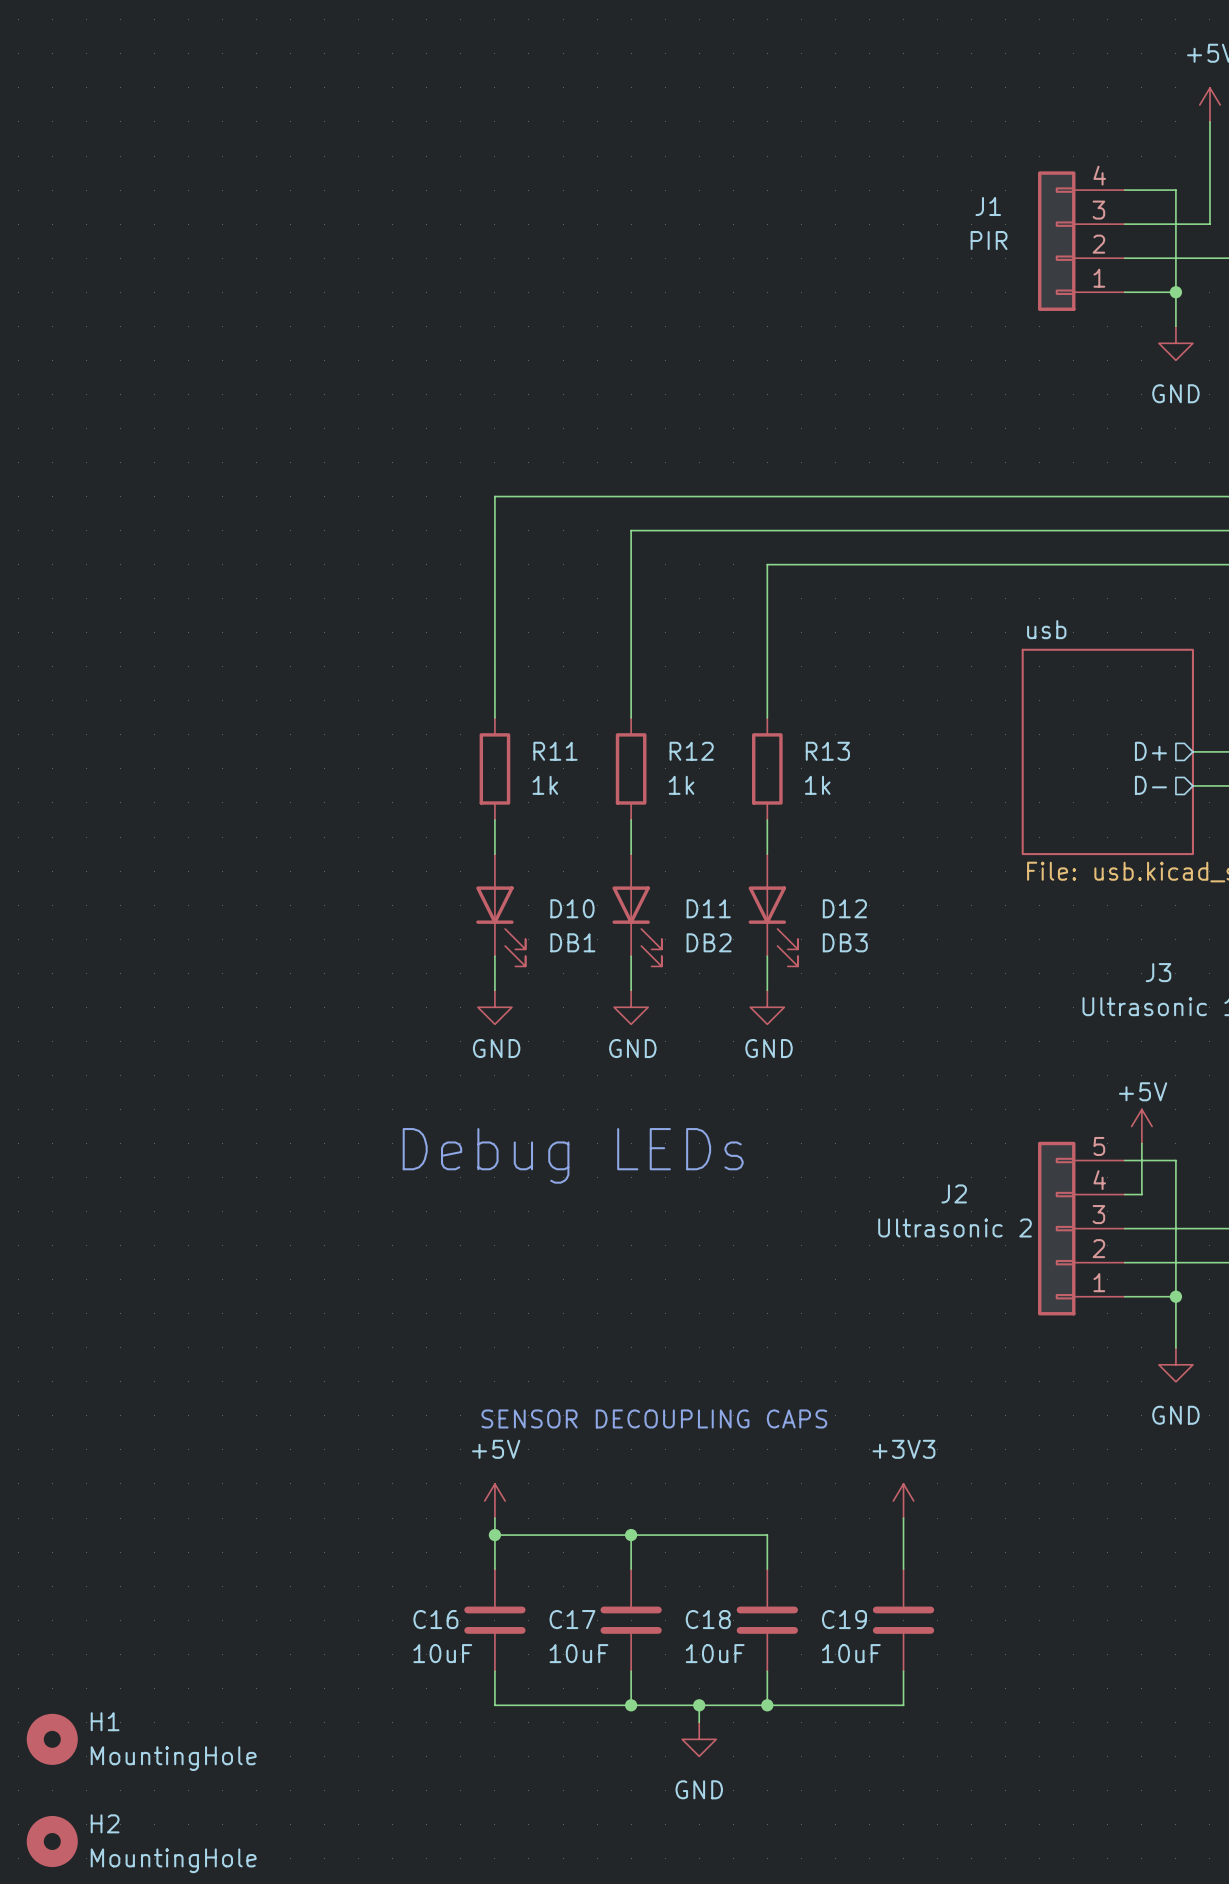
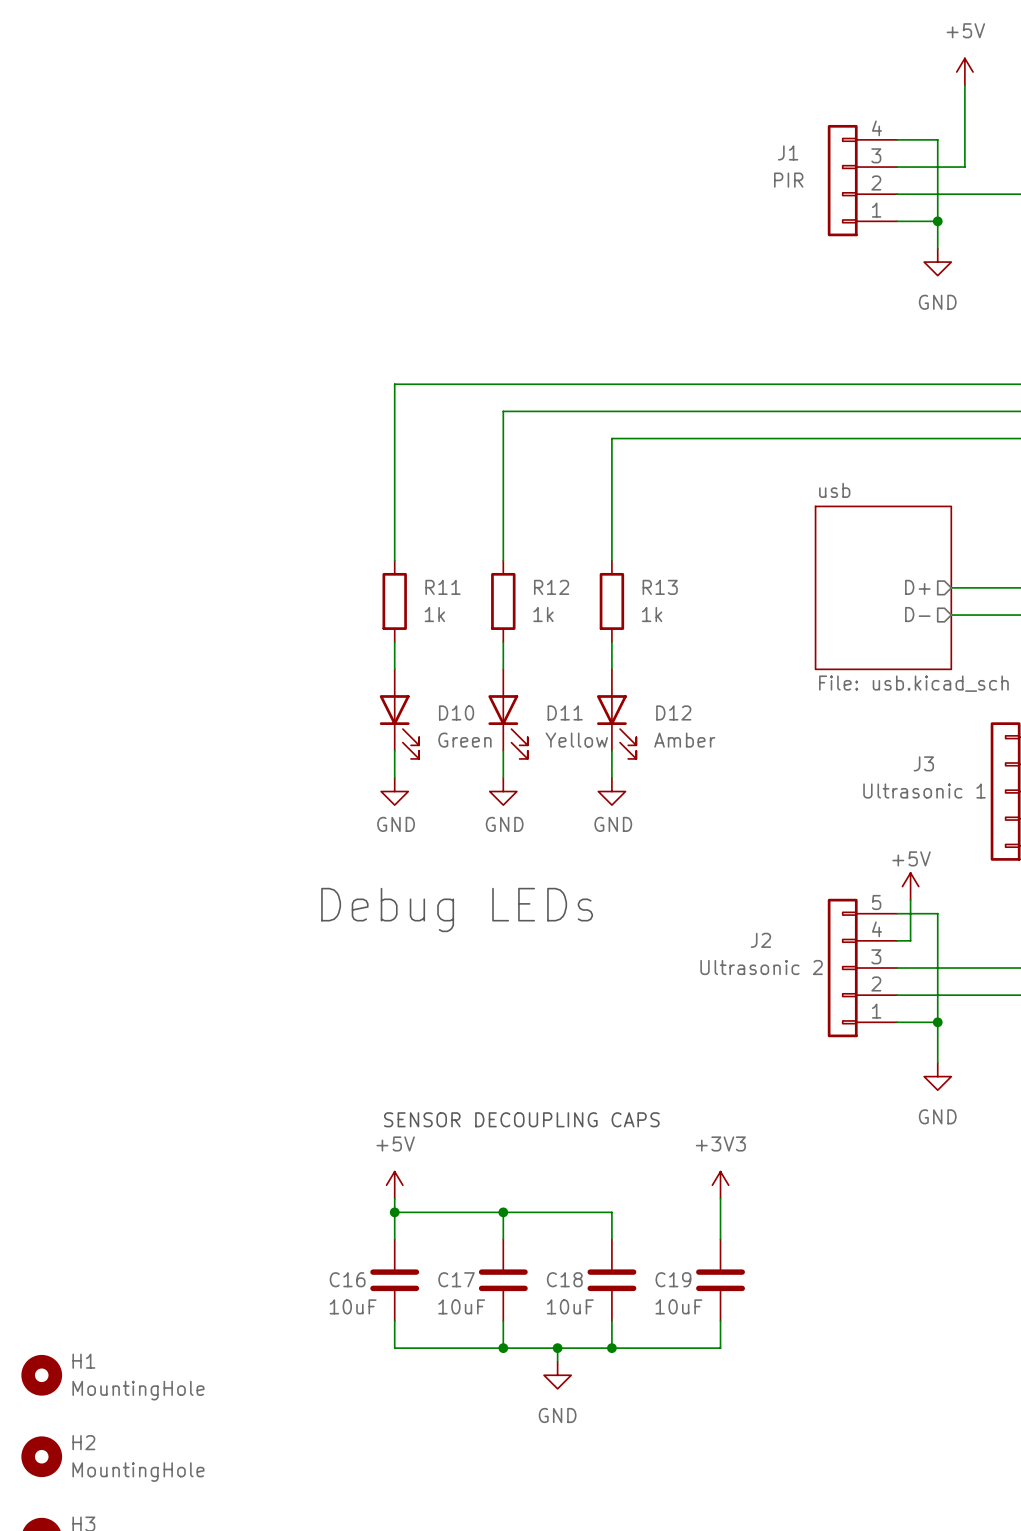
D10 value: DB1 (572, 942) -> Green (464, 740)
D11 value: DB2 (709, 942) -> Yellow (576, 740)
D12 value: DB3 (845, 942) -> Amber (684, 740)

